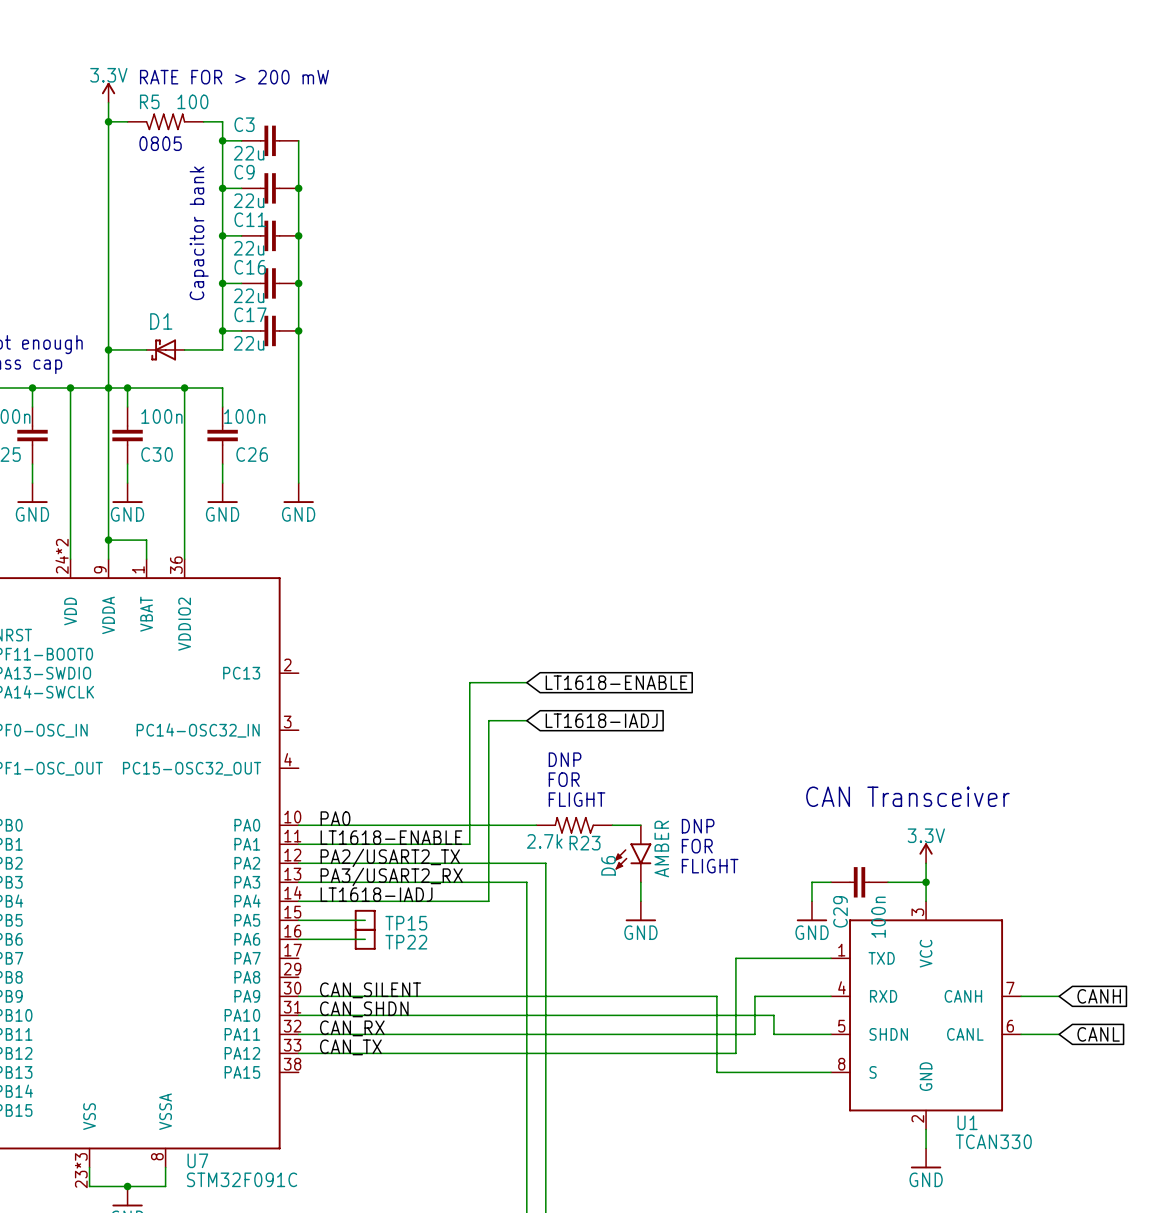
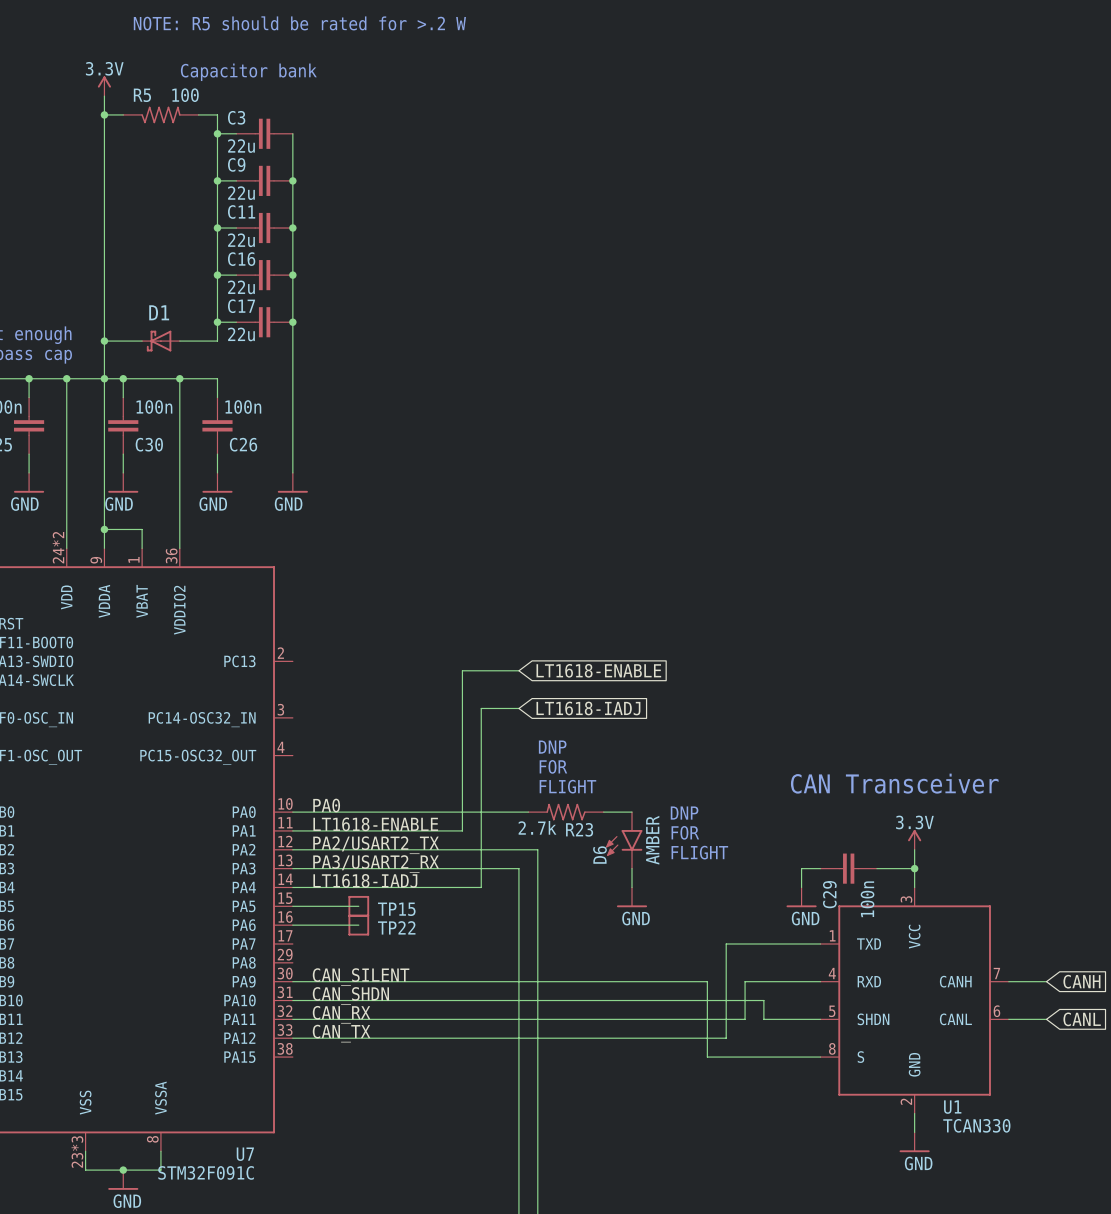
text: none -> NOTE: R5 should be rated for >.2 W (299, 23)
text: RATE FOR > 200 mW (234, 77) -> none
text: none -> Capacitor bank (248, 72)
text: 0805 (160, 143) -> none
text: Capacitor bank (199, 233) -> none
U7 name position: U7 (197, 1160) -> U7 (245, 1154)
U7 value position: STM32F091C (242, 1179) -> STM32F091C (206, 1172)

